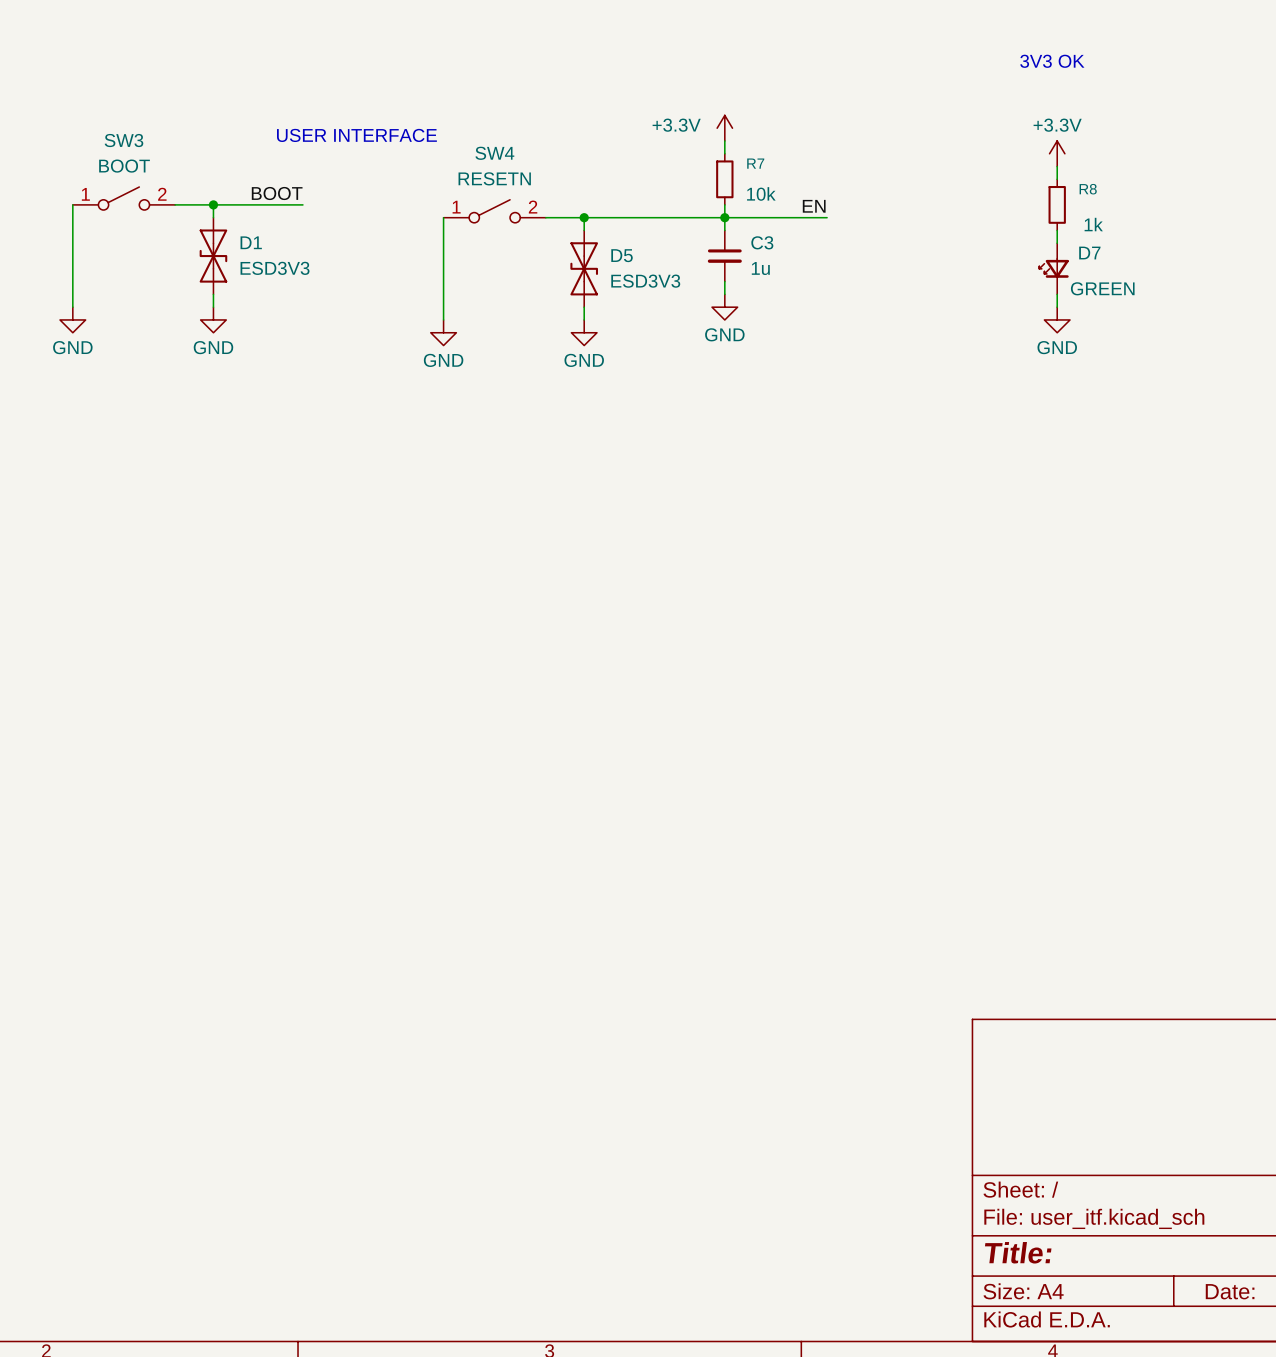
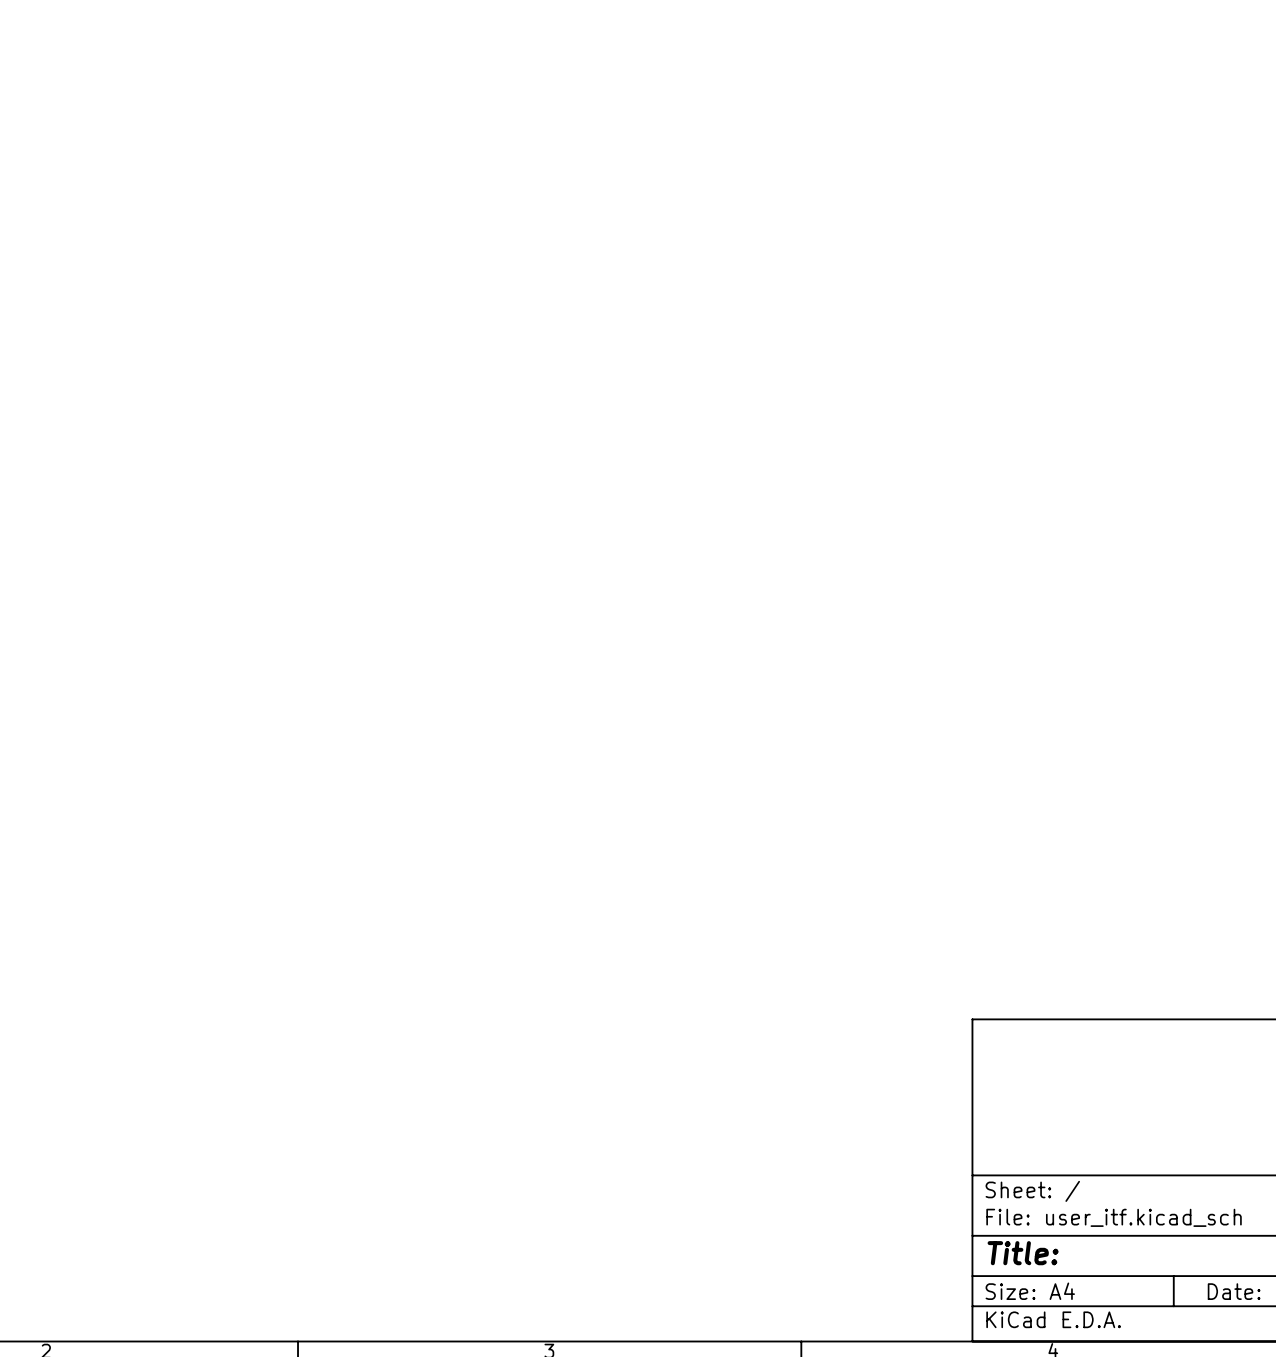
text: 3V3 OK (1052, 61) -> none
power symbol: +3.3V (724, 128) -> none
text: USER INTERFACE (356, 135) -> none
wire: (724, 140) (724, 153) -> none
power symbol: +3.3V (1057, 153) -> none
wire: (1057, 166) (1057, 179) -> none
R7: 10k (724, 179) -> none
label: BOOT (277, 193) -> none
SW3: BOOT (123, 198) -> none
wire: (72, 204) (72, 307) -> none
wire: (175, 204) (302, 204) -> none
wire: (213, 204) (213, 217) -> none
junction: (213, 204) -> none
wire: (724, 204) (724, 230) -> none
R8: 1k (1057, 204) -> none
label: EN (814, 206) -> none
SW4: RESETN (494, 211) -> none
wire: (443, 217) (443, 319) -> none
wire: (545, 217) (827, 217) -> none
wire: (584, 217) (584, 230) -> none
junction: (584, 217) -> none
junction: (724, 217) -> none
wire: (1057, 230) (1057, 243) -> none
D1: ESD3V3 (213, 256) -> none
C3: 1u (724, 256) -> none
D5: ESD3V3 (584, 268) -> none
D7: GREEN (1054, 268) -> none
wire: (724, 281) (724, 294) -> none
wire: (213, 294) (213, 307) -> none
wire: (1057, 294) (1057, 307) -> none
wire: (584, 307) (584, 319) -> none
power symbol: GND (724, 307) -> none
power symbol: GND (72, 319) -> none
power symbol: GND (213, 319) -> none
power symbol: GND (1057, 319) -> none
power symbol: GND (443, 332) -> none
power symbol: GND (584, 332) -> none

